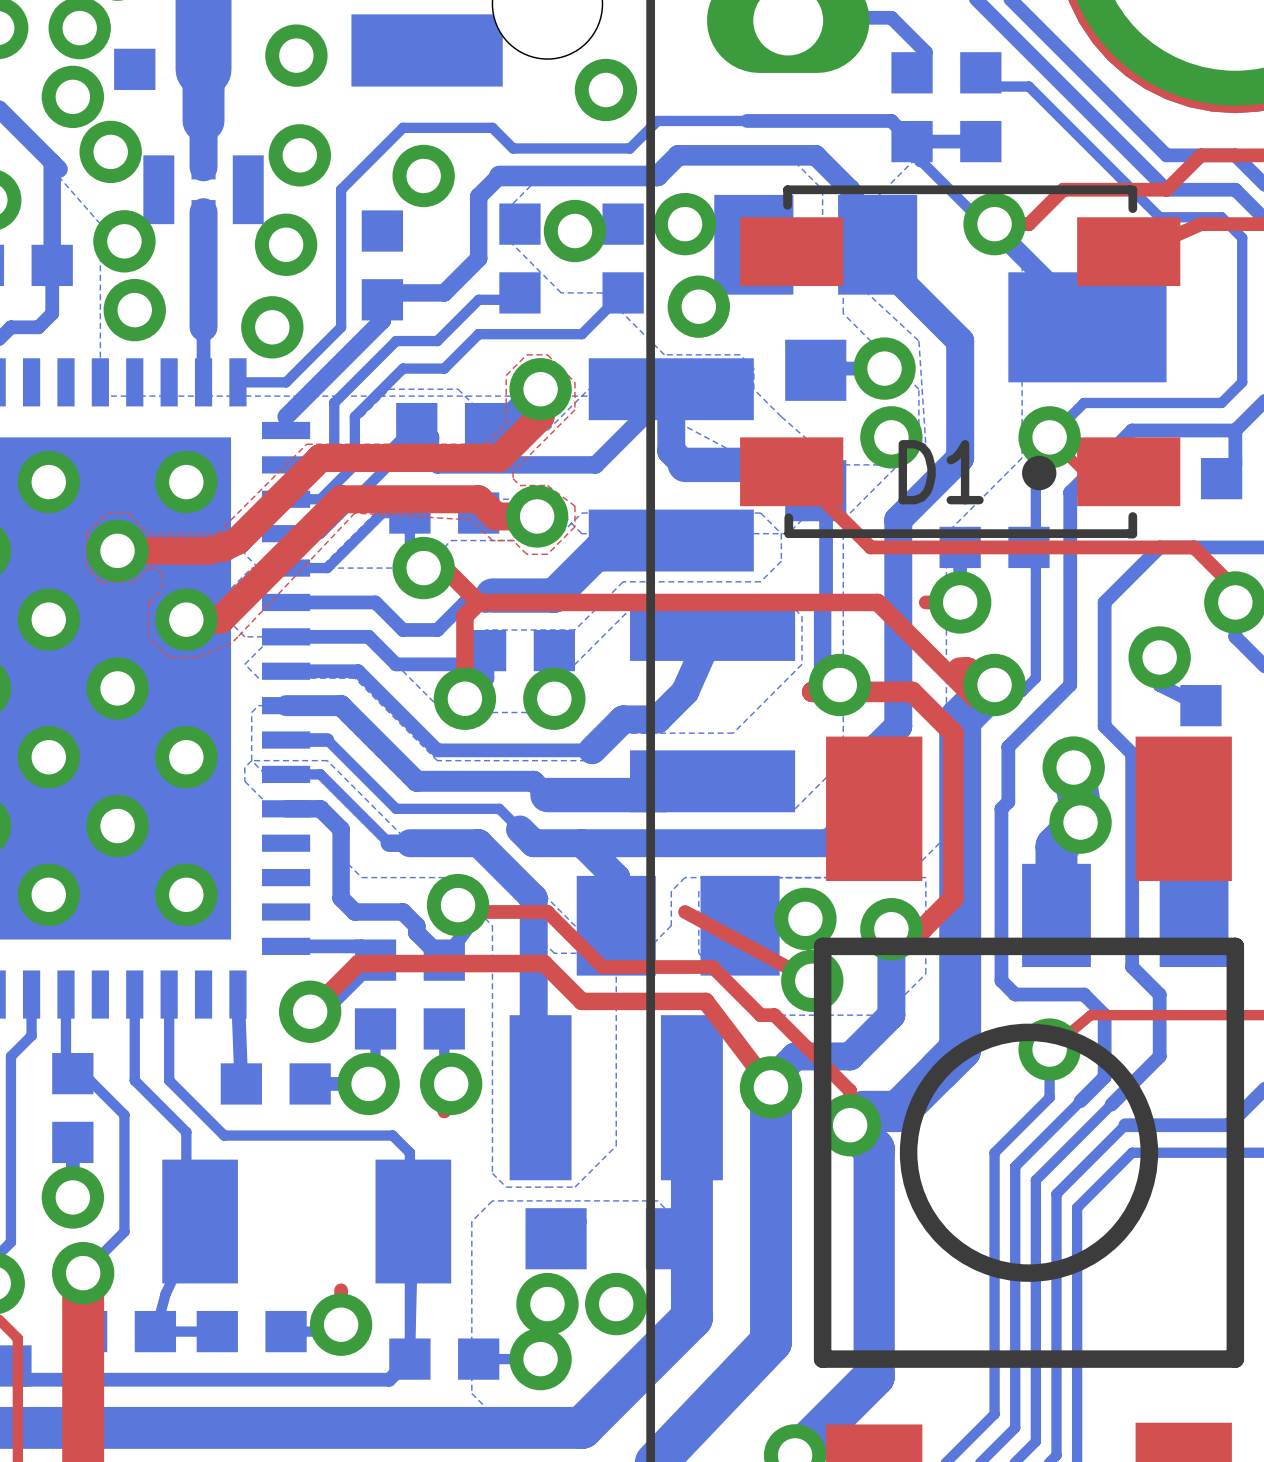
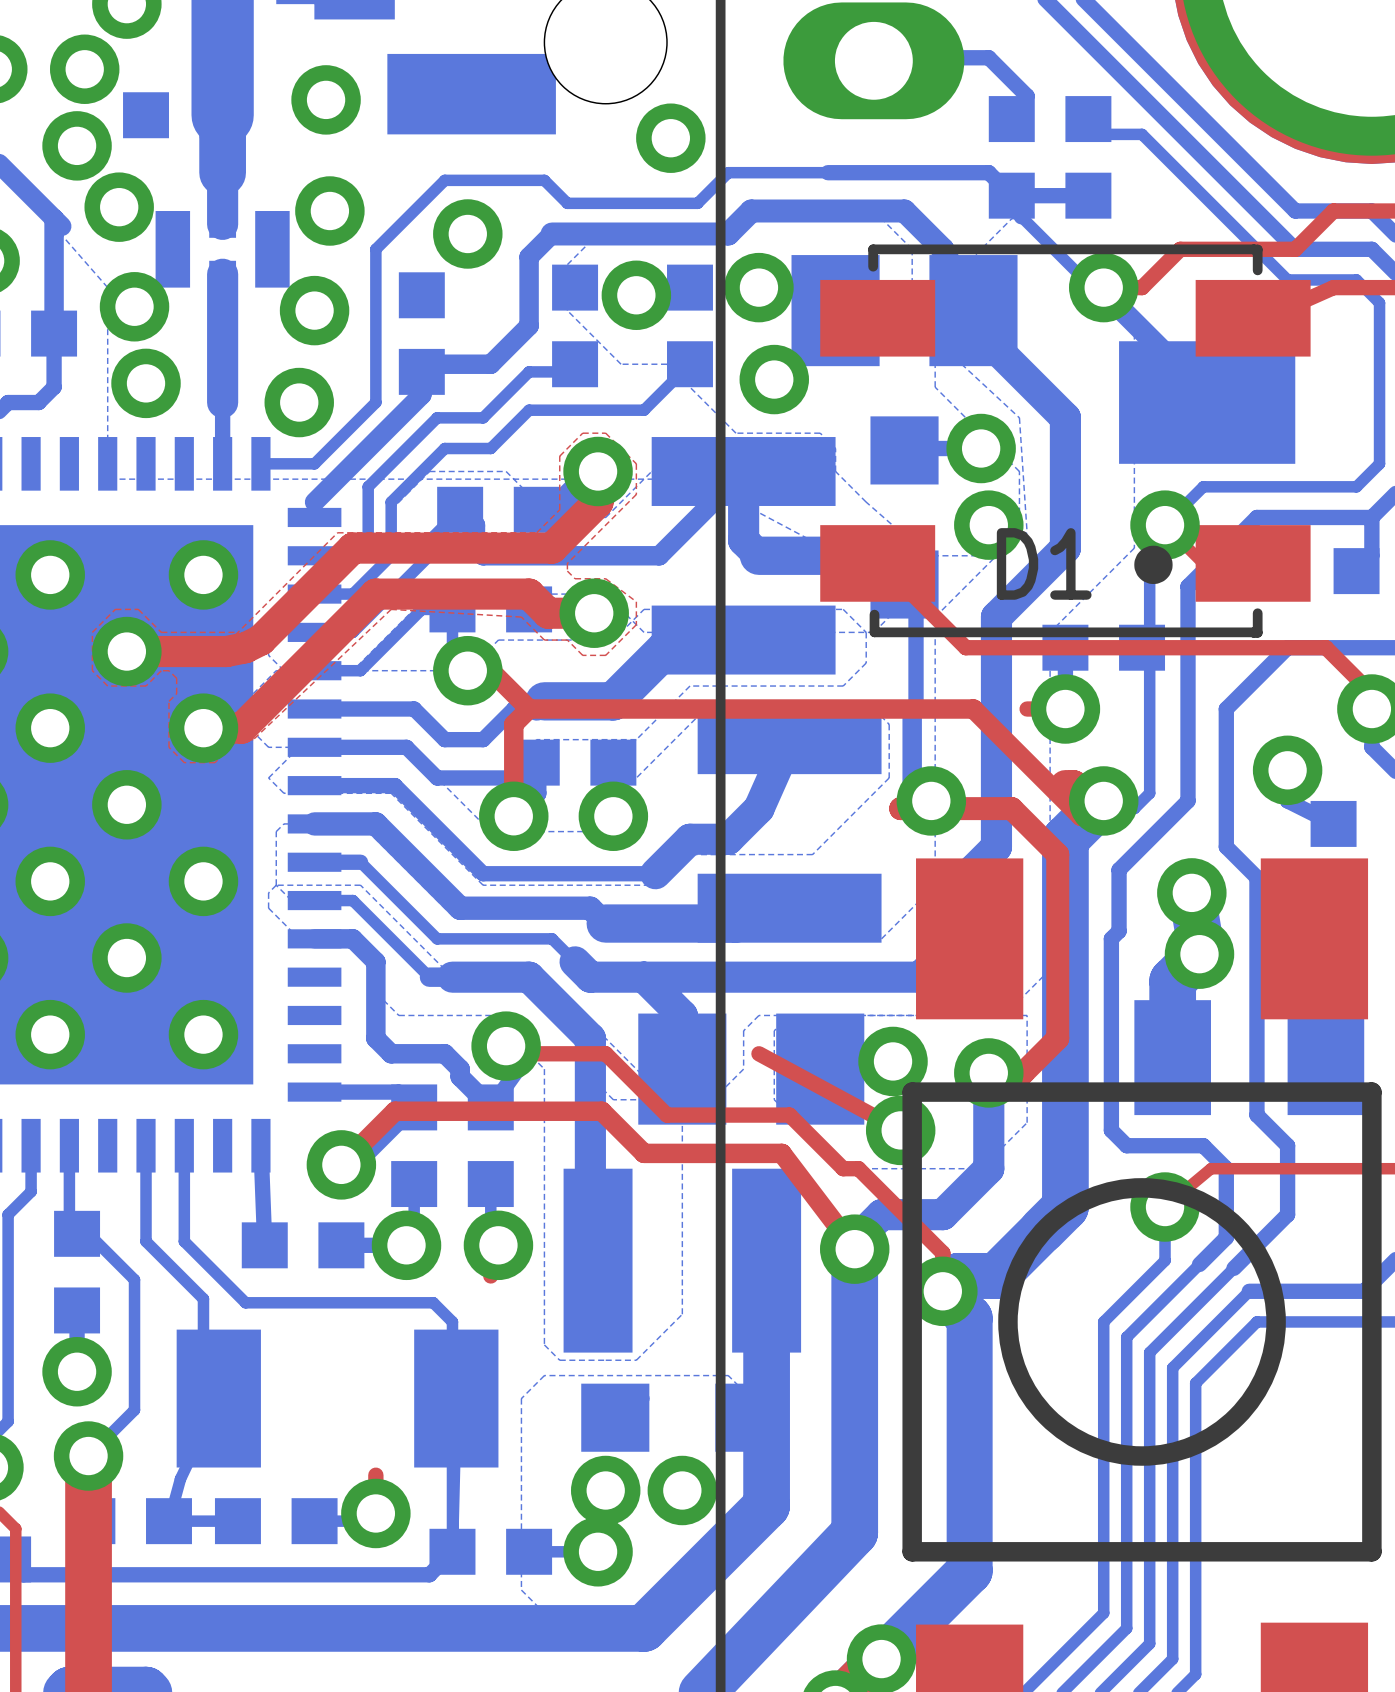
top zone outline: (354, 513) (231, 643) (196, 657) (169, 657) (148, 636) (148, 602) (155, 595) -> (391, 609) (253, 739) (237, 739) (214, 762) (184, 762) (168, 747) (168, 701)

